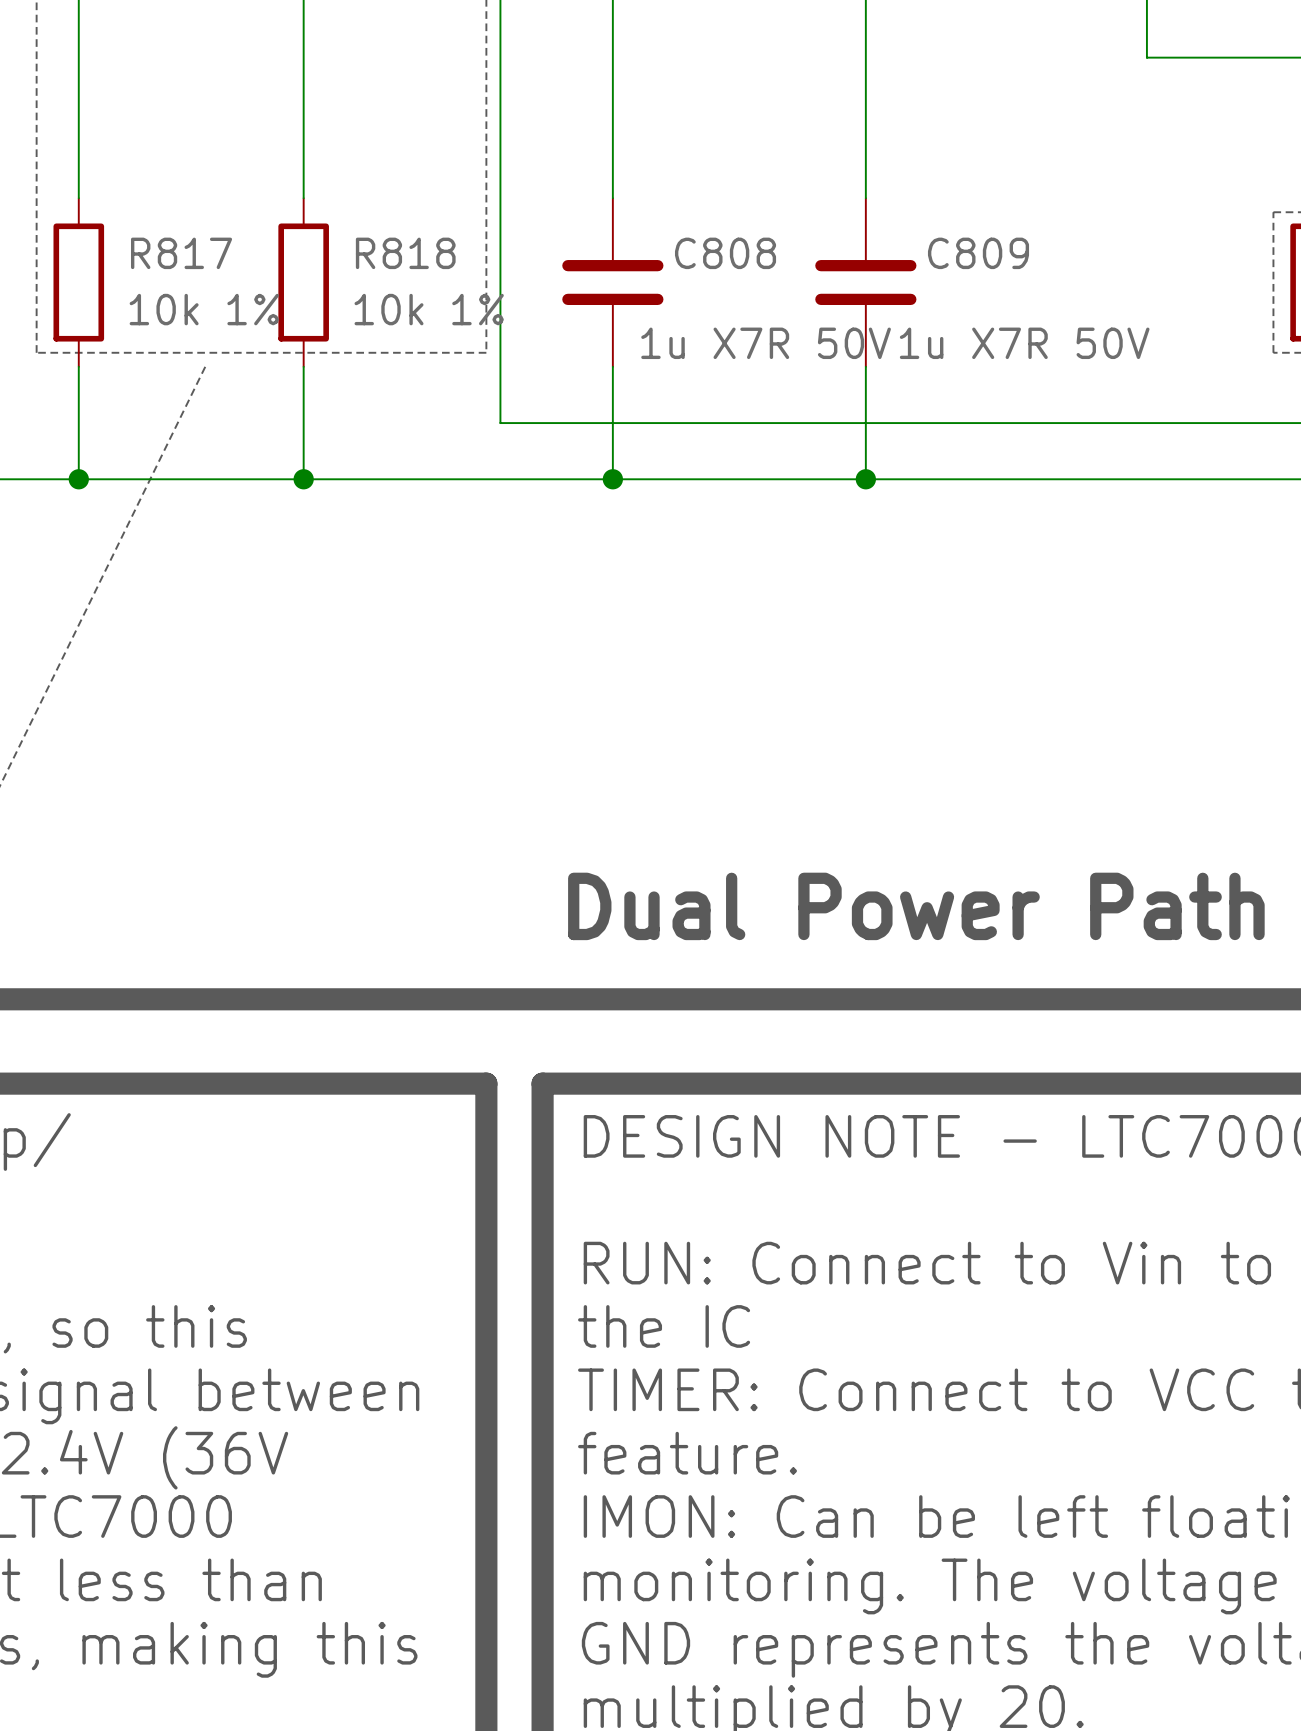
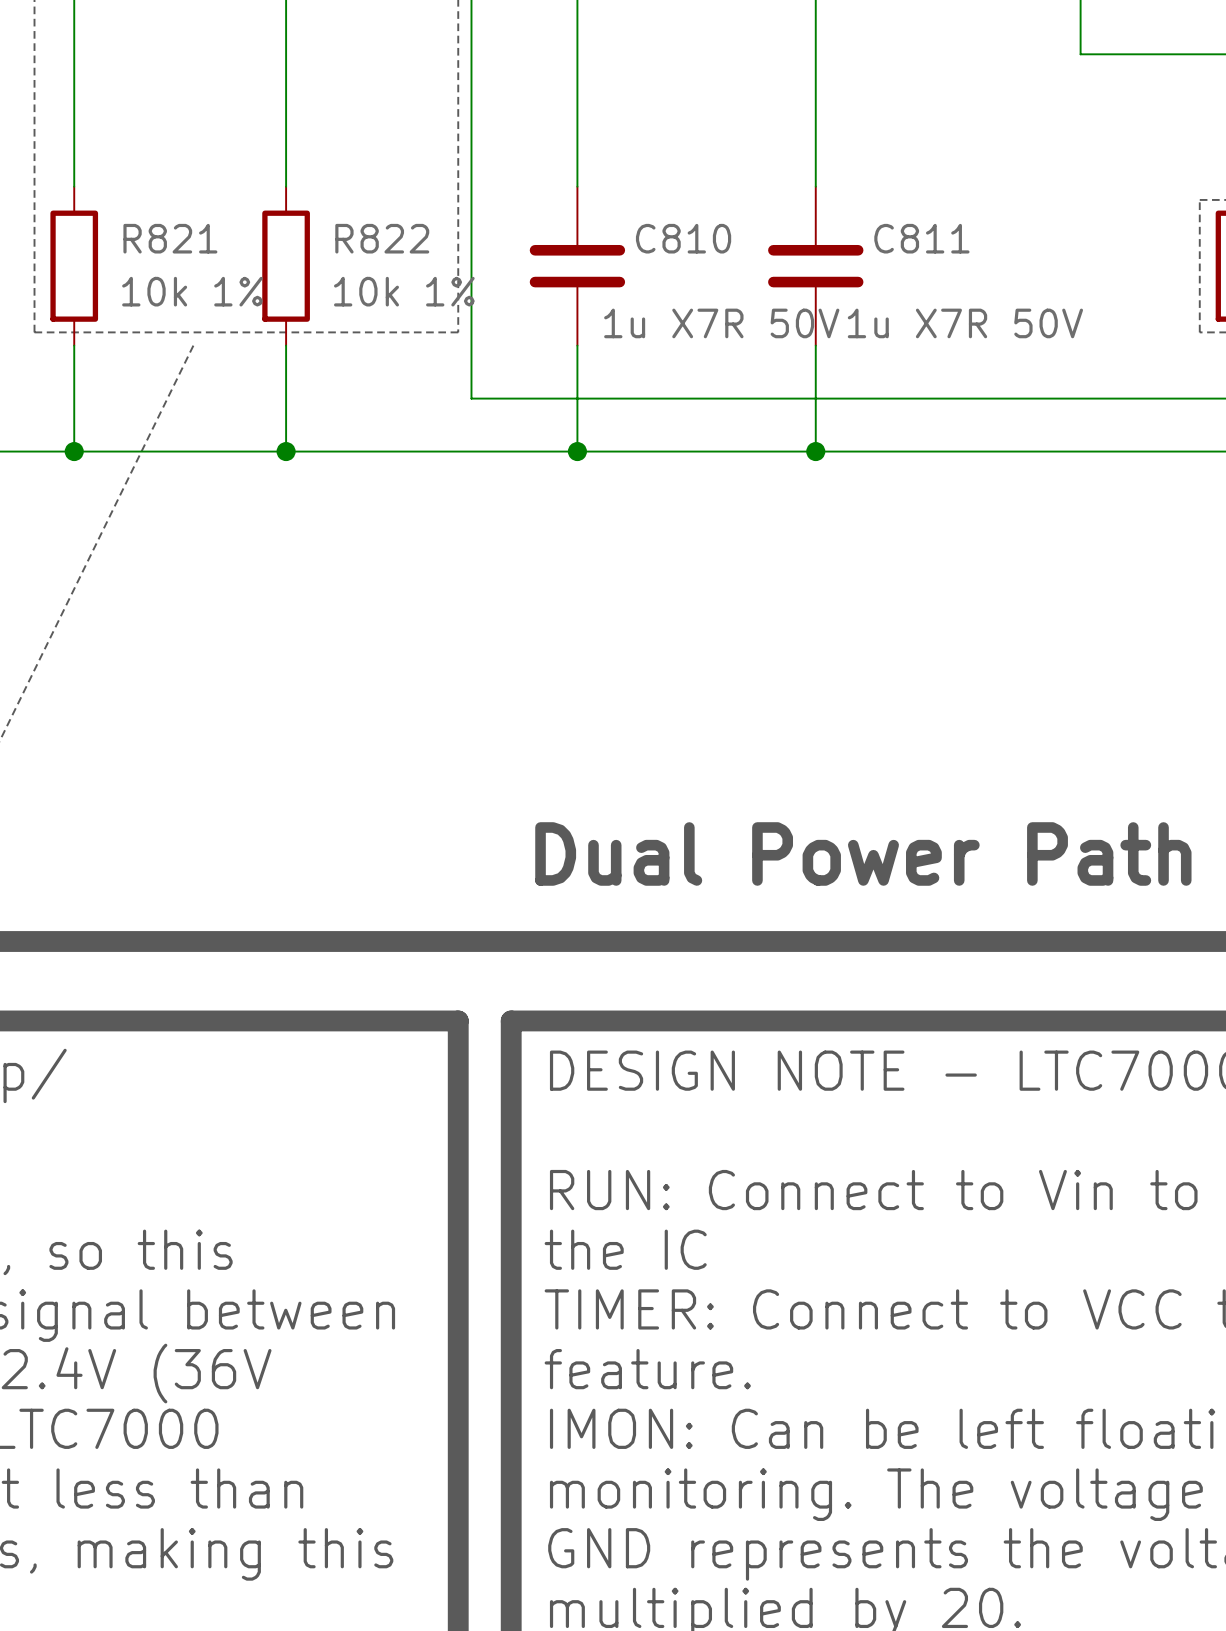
R817 name: R817 (181, 253) -> R821 (170, 238)
R818 name: R818 (405, 253) -> R822 (382, 238)
C808 name: C808 (725, 253) -> C810 (683, 238)
C809 name: C809 (978, 253) -> C811 (921, 238)

